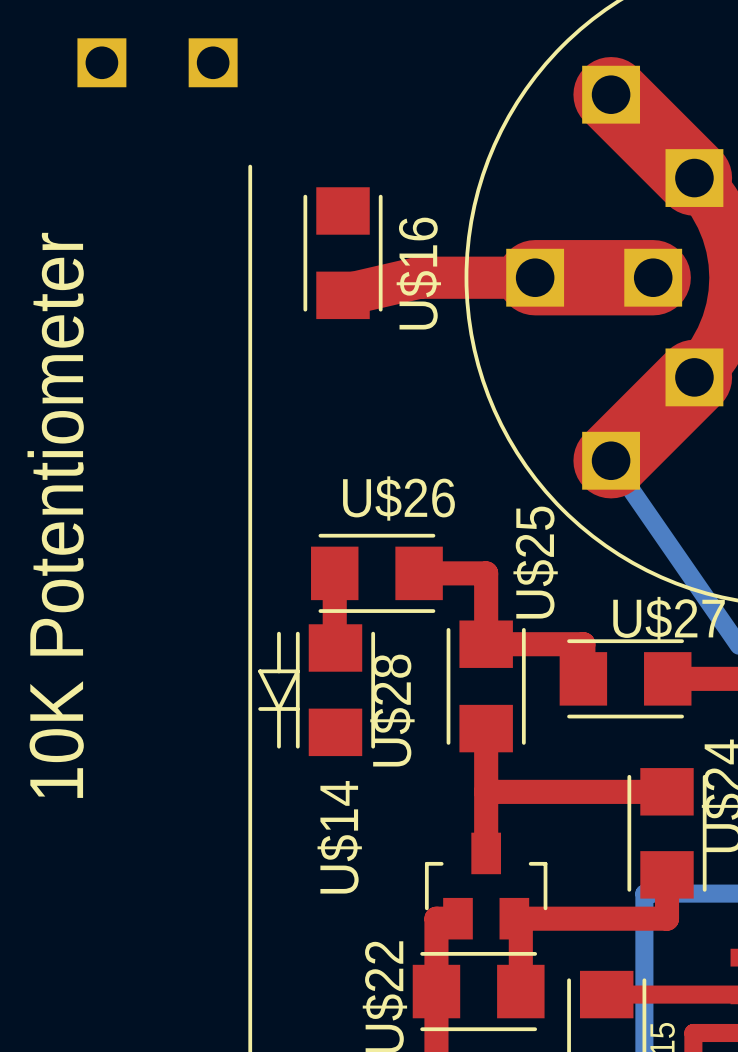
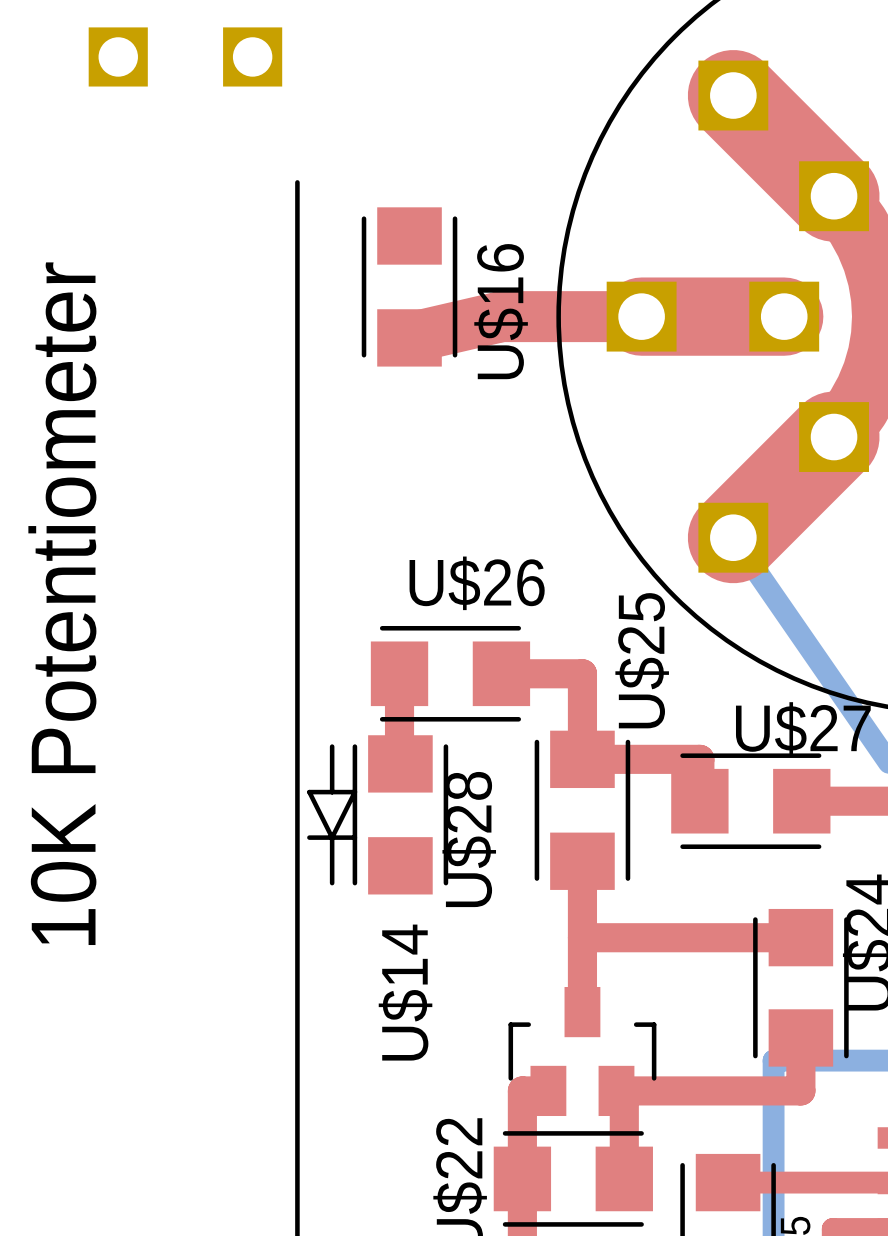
top track width: thick (535, 277) (653, 277) -> thin (641, 316) (784, 316)

